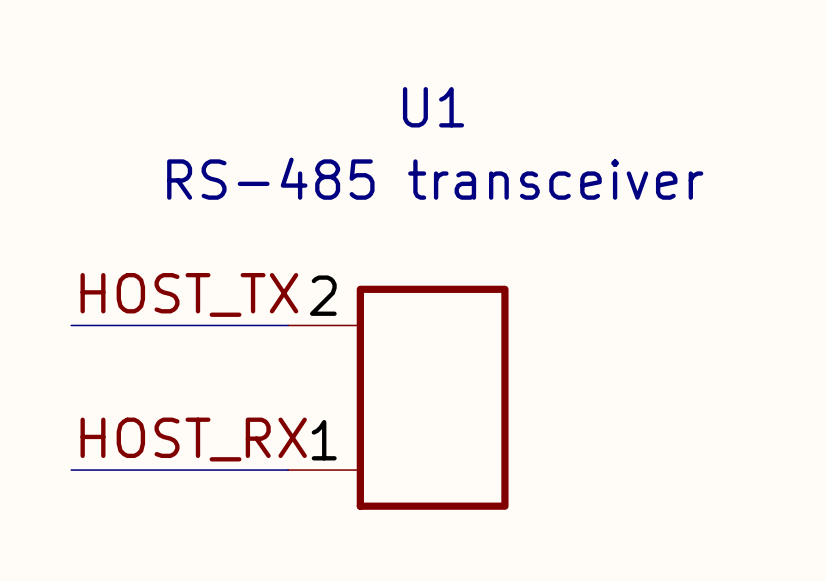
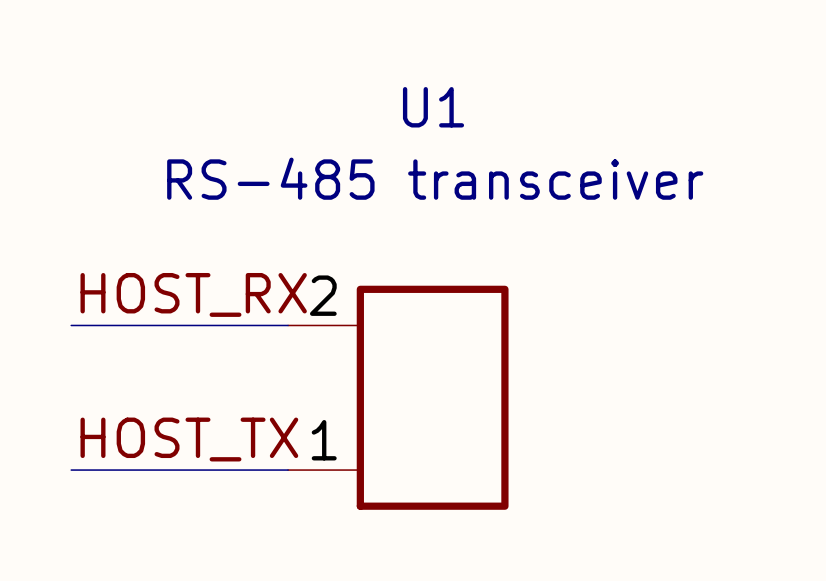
label: HOST_TX (189, 294) -> HOST_RX (193, 294)
label: HOST_RX (193, 439) -> HOST_TX (189, 439)

